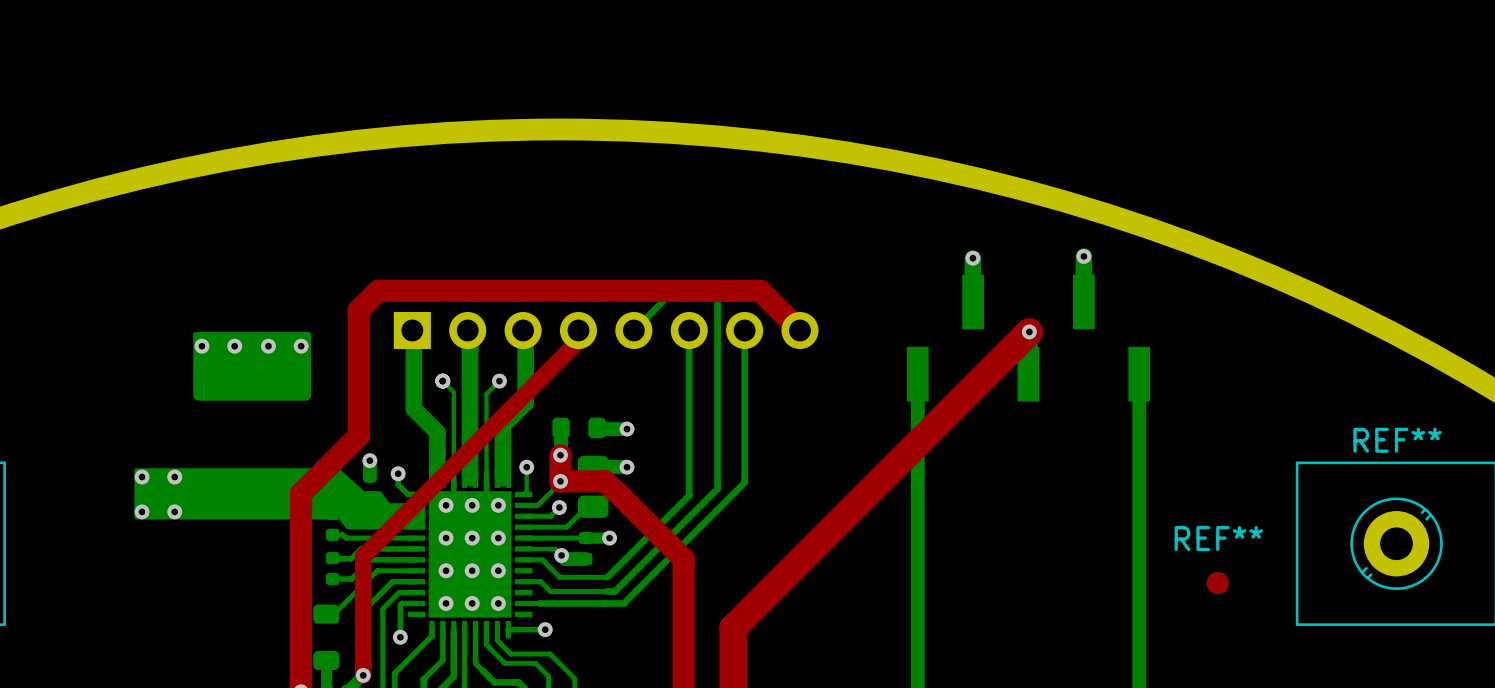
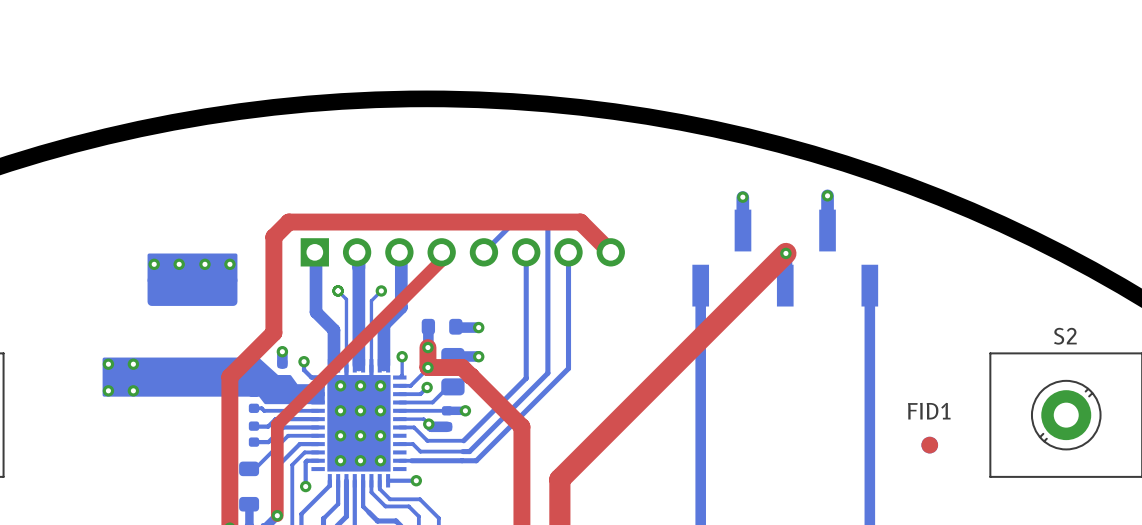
REF** name: REF** (1397, 440) -> S2 (1065, 336)
REF** name: REF** (1218, 538) -> FID1 (929, 411)

